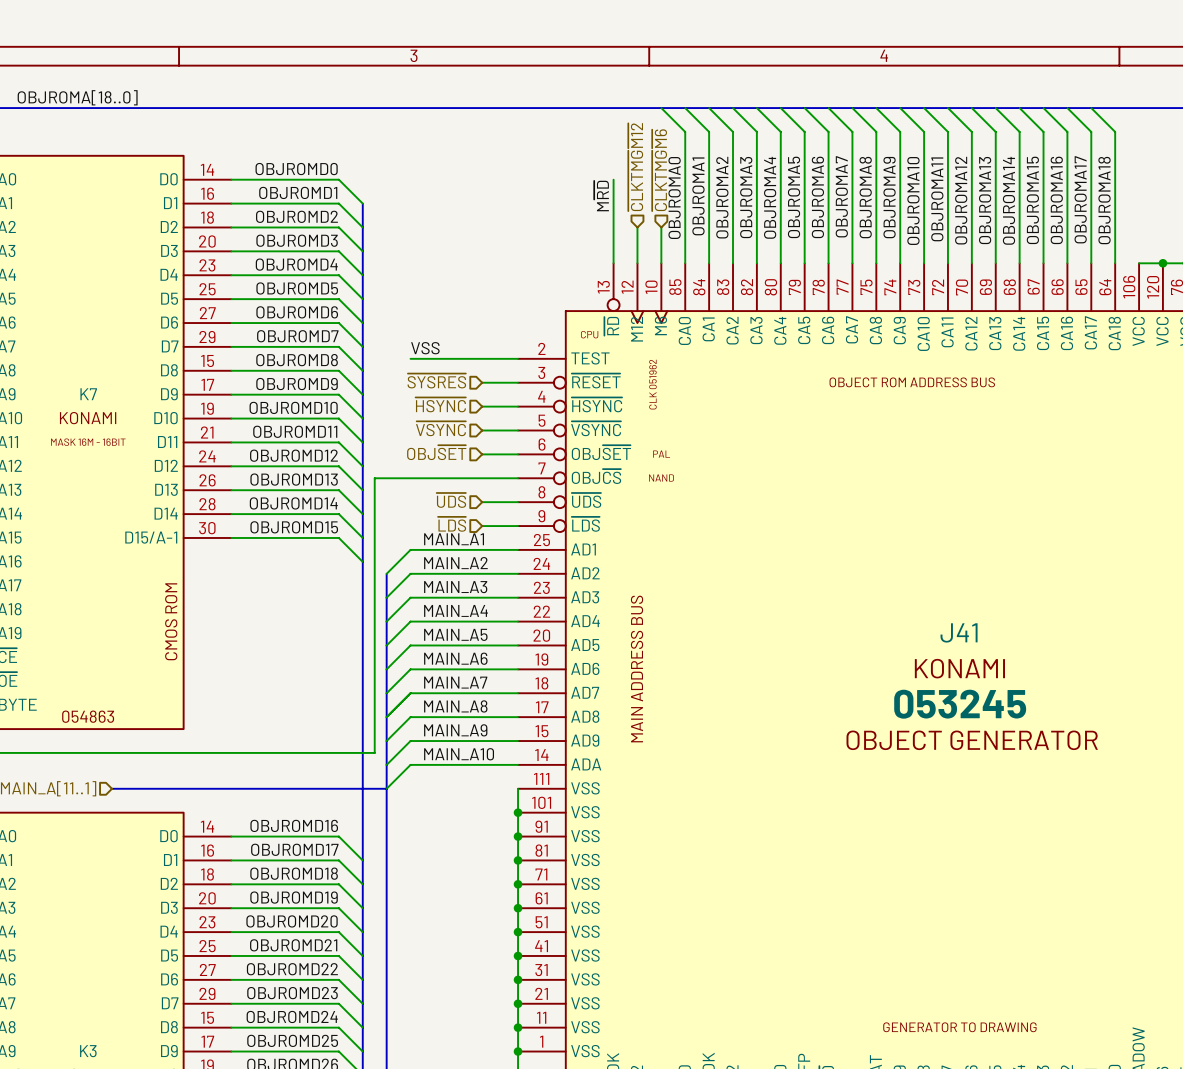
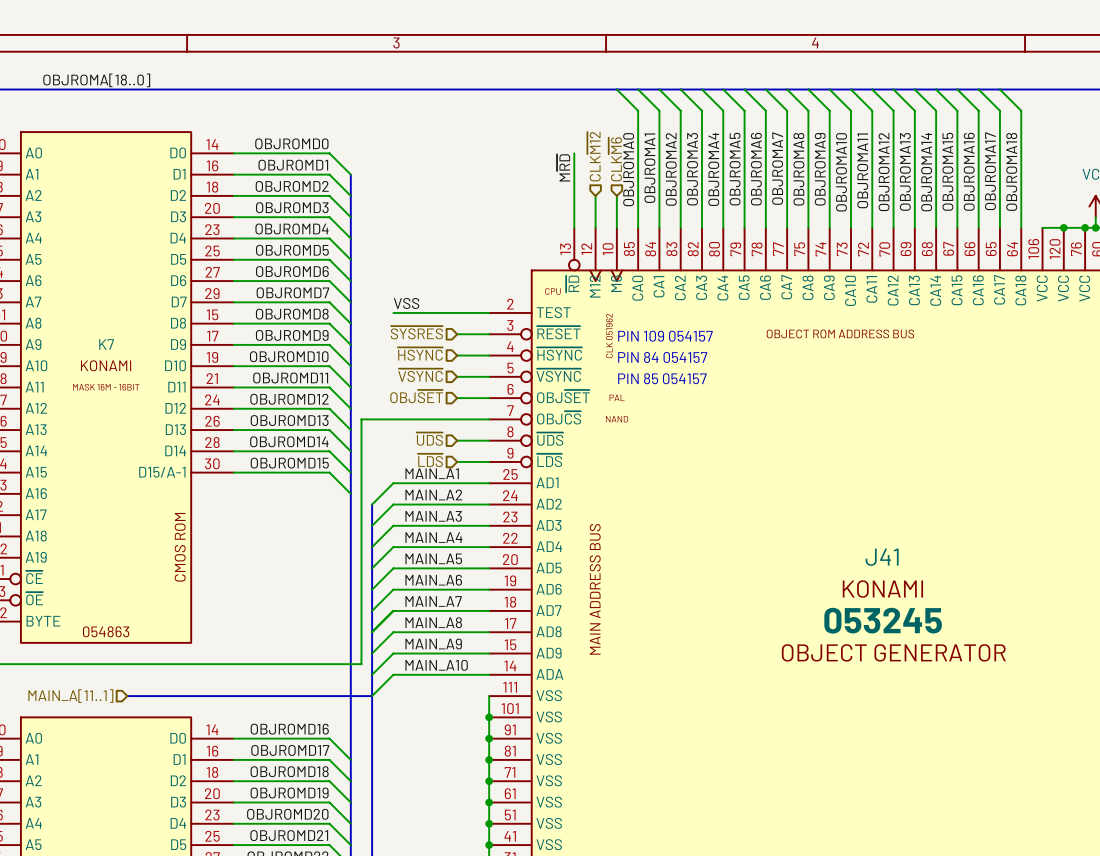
hierarchical label: ~{CLKTMG}~{M12} (635, 167) -> CLK~{M12} (594, 156)
hierarchical label: ~{CLKTMG}~{M6} (659, 170) -> CLK~{M6} (615, 159)
text: none -> PIN 109 054157 (665, 336)
text: none -> PIN 84 054157 (662, 357)
text: none -> PIN 85 054157 (662, 378)

